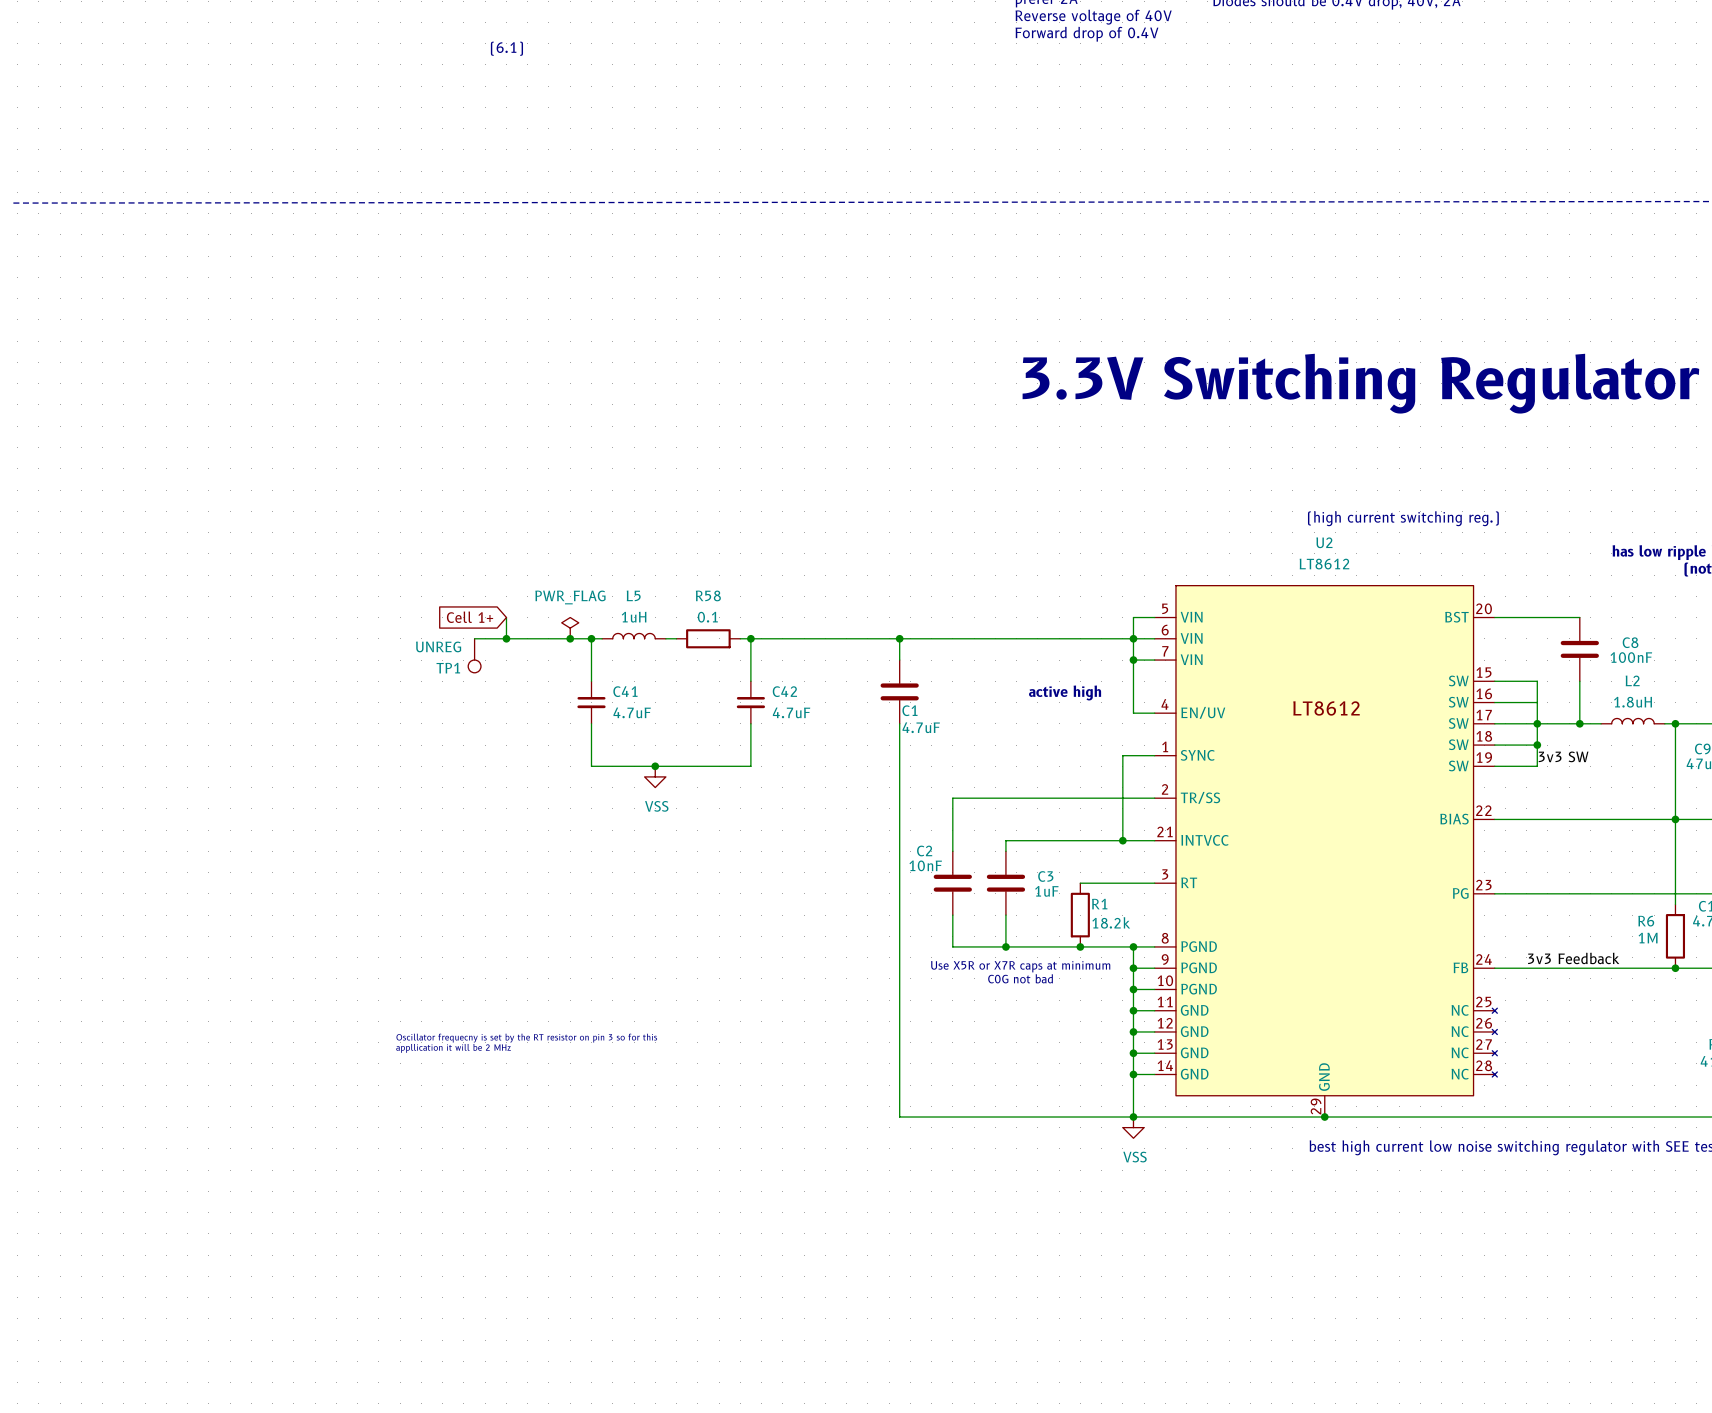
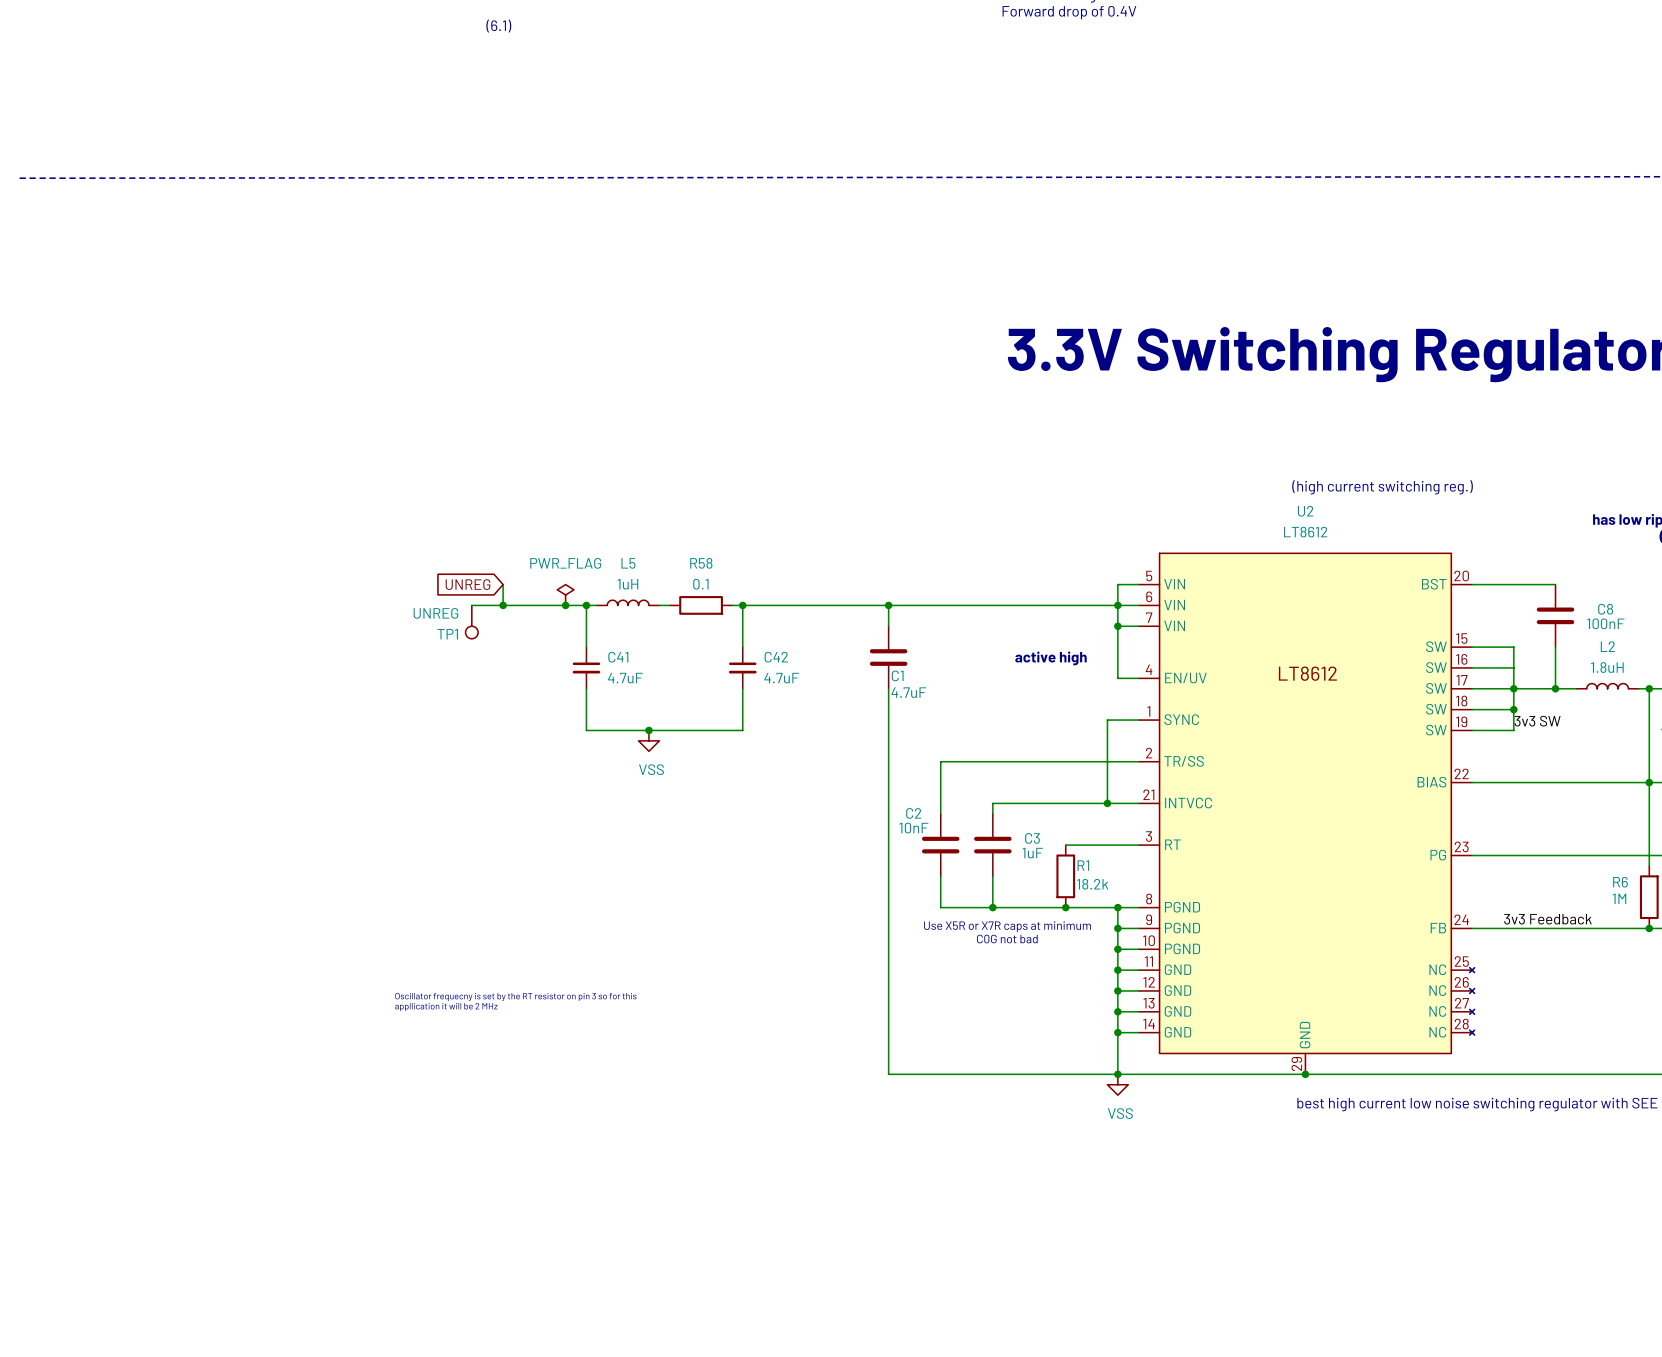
global label: Cell 1+ (470, 617) -> UNREG (468, 584)

